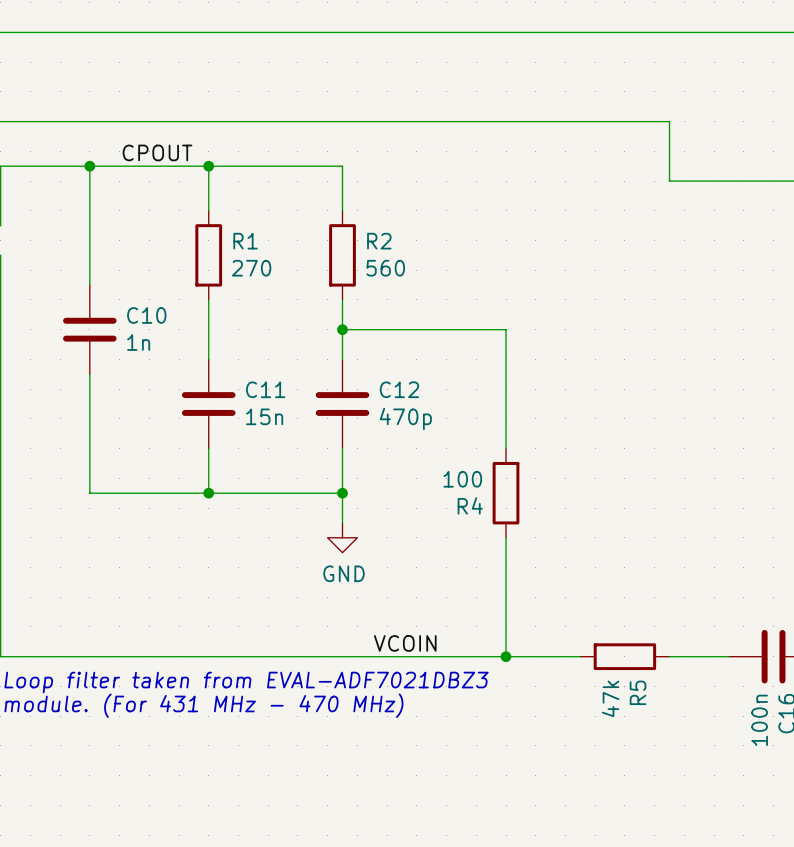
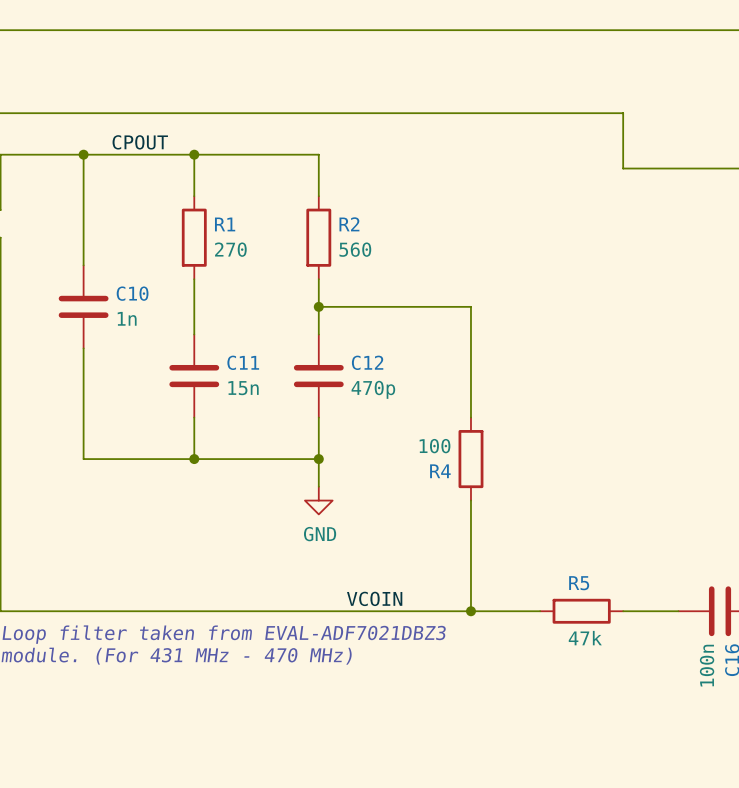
R5 name rotation: 0° (638, 692) -> 90° clockwise (579, 583)
R5 name position: R5 (638, 692) -> R5 (579, 583)
R5 value rotation: 0° (610, 698) -> 90° clockwise (585, 638)

